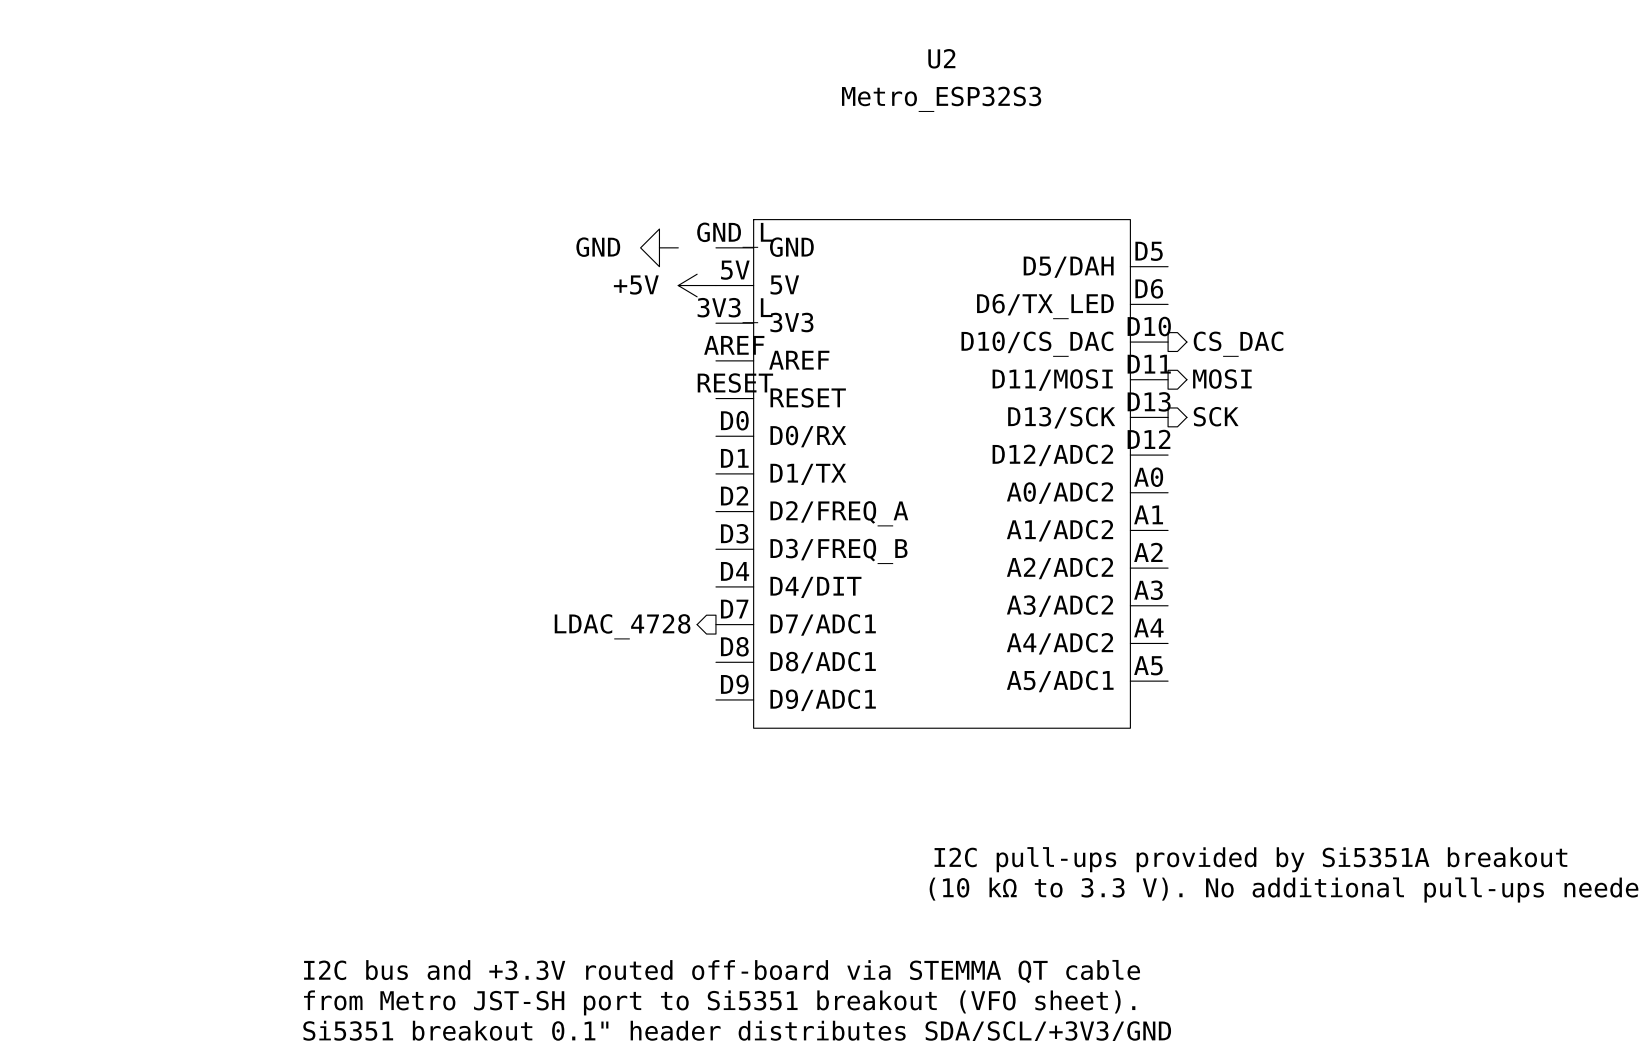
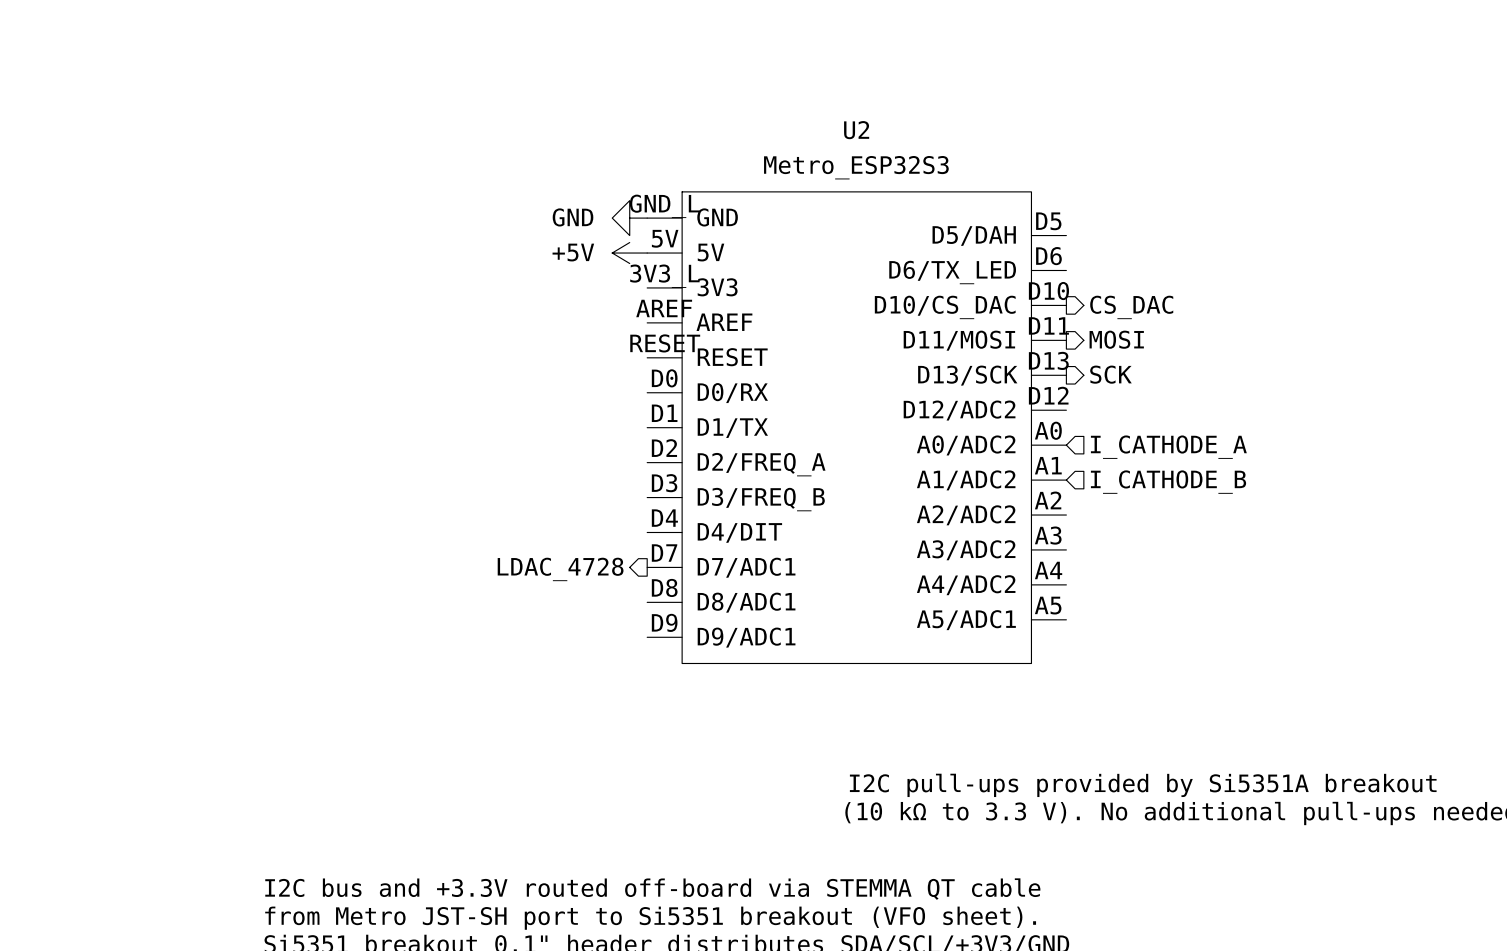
U2 name position: U2 (941, 58) -> U2 (856, 130)
U2 value position: Metro_ESP32S3 (941, 99) -> Metro_ESP32S3 (856, 167)
power symbol position: GND (659, 247) -> GND (629, 218)
hierarchical label: none -> I_CATHODE_A (1168, 447)
hierarchical label: none -> I_CATHODE_B (1168, 482)

